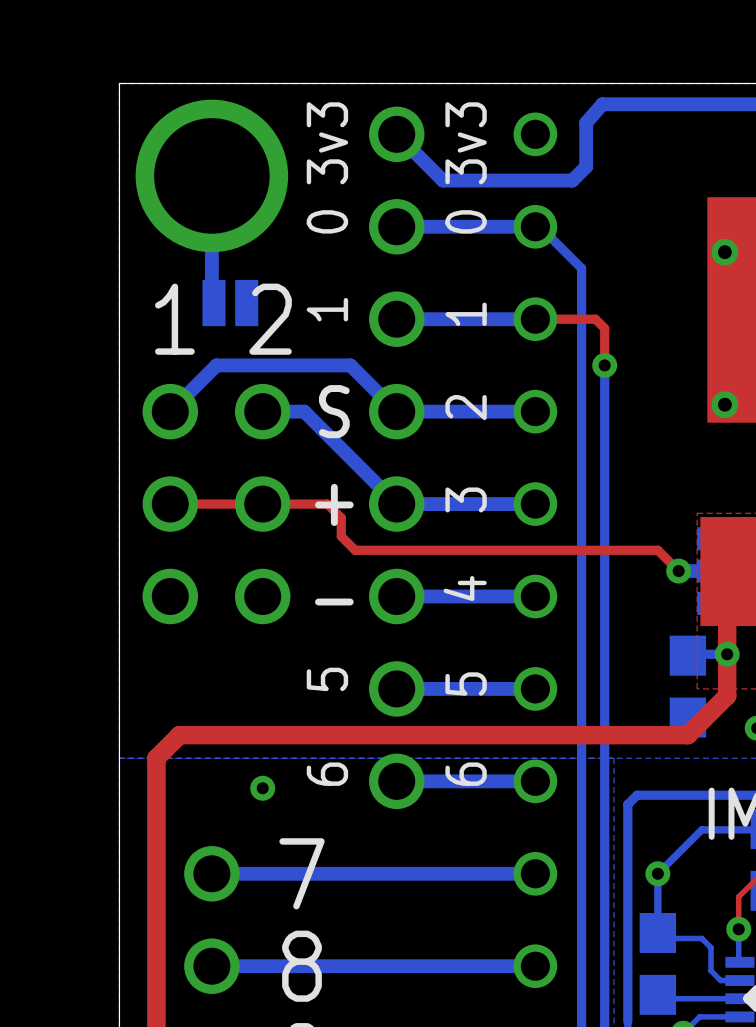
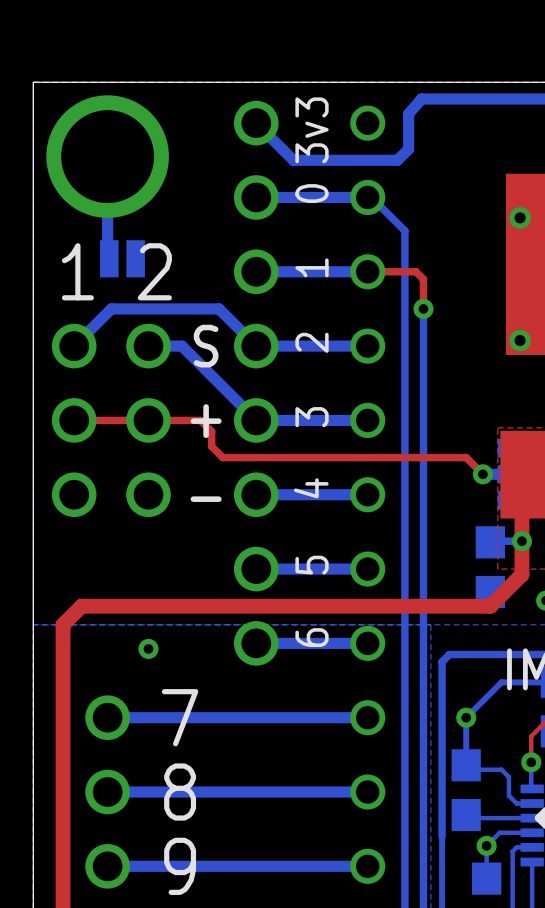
text: 3v3 (327, 143) -> none
text: 0 (327, 221) -> none
text: 1 (327, 309) -> none
text: 5 (327, 679) -> none
text: 6 (327, 774) -> none

